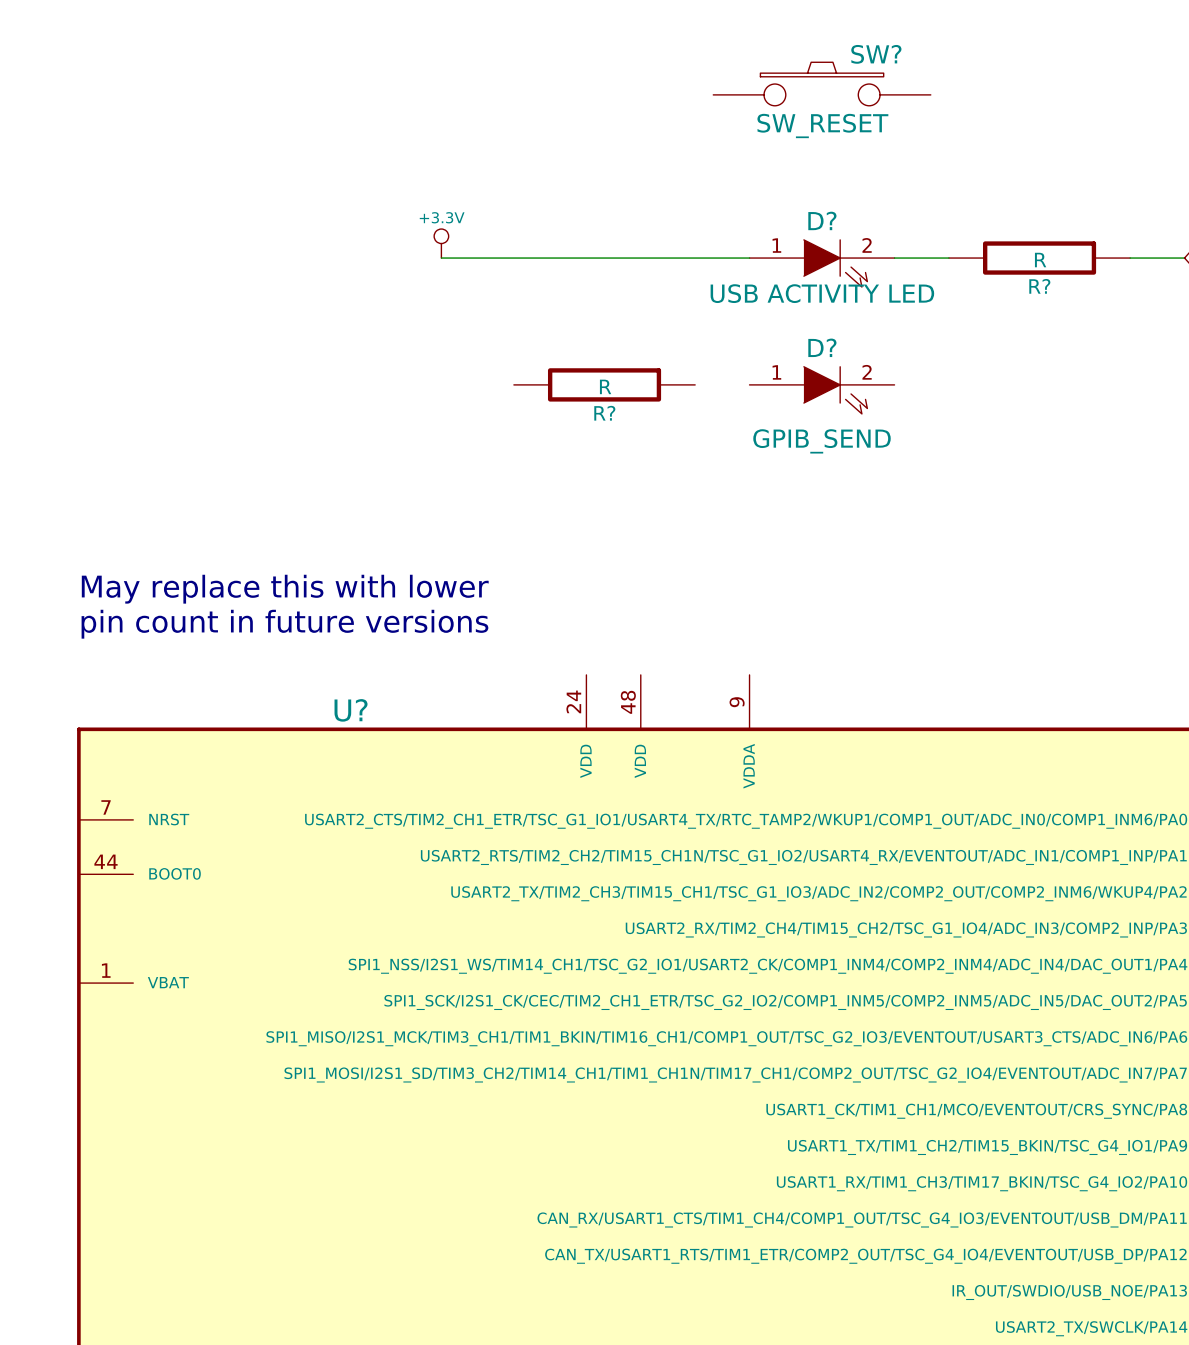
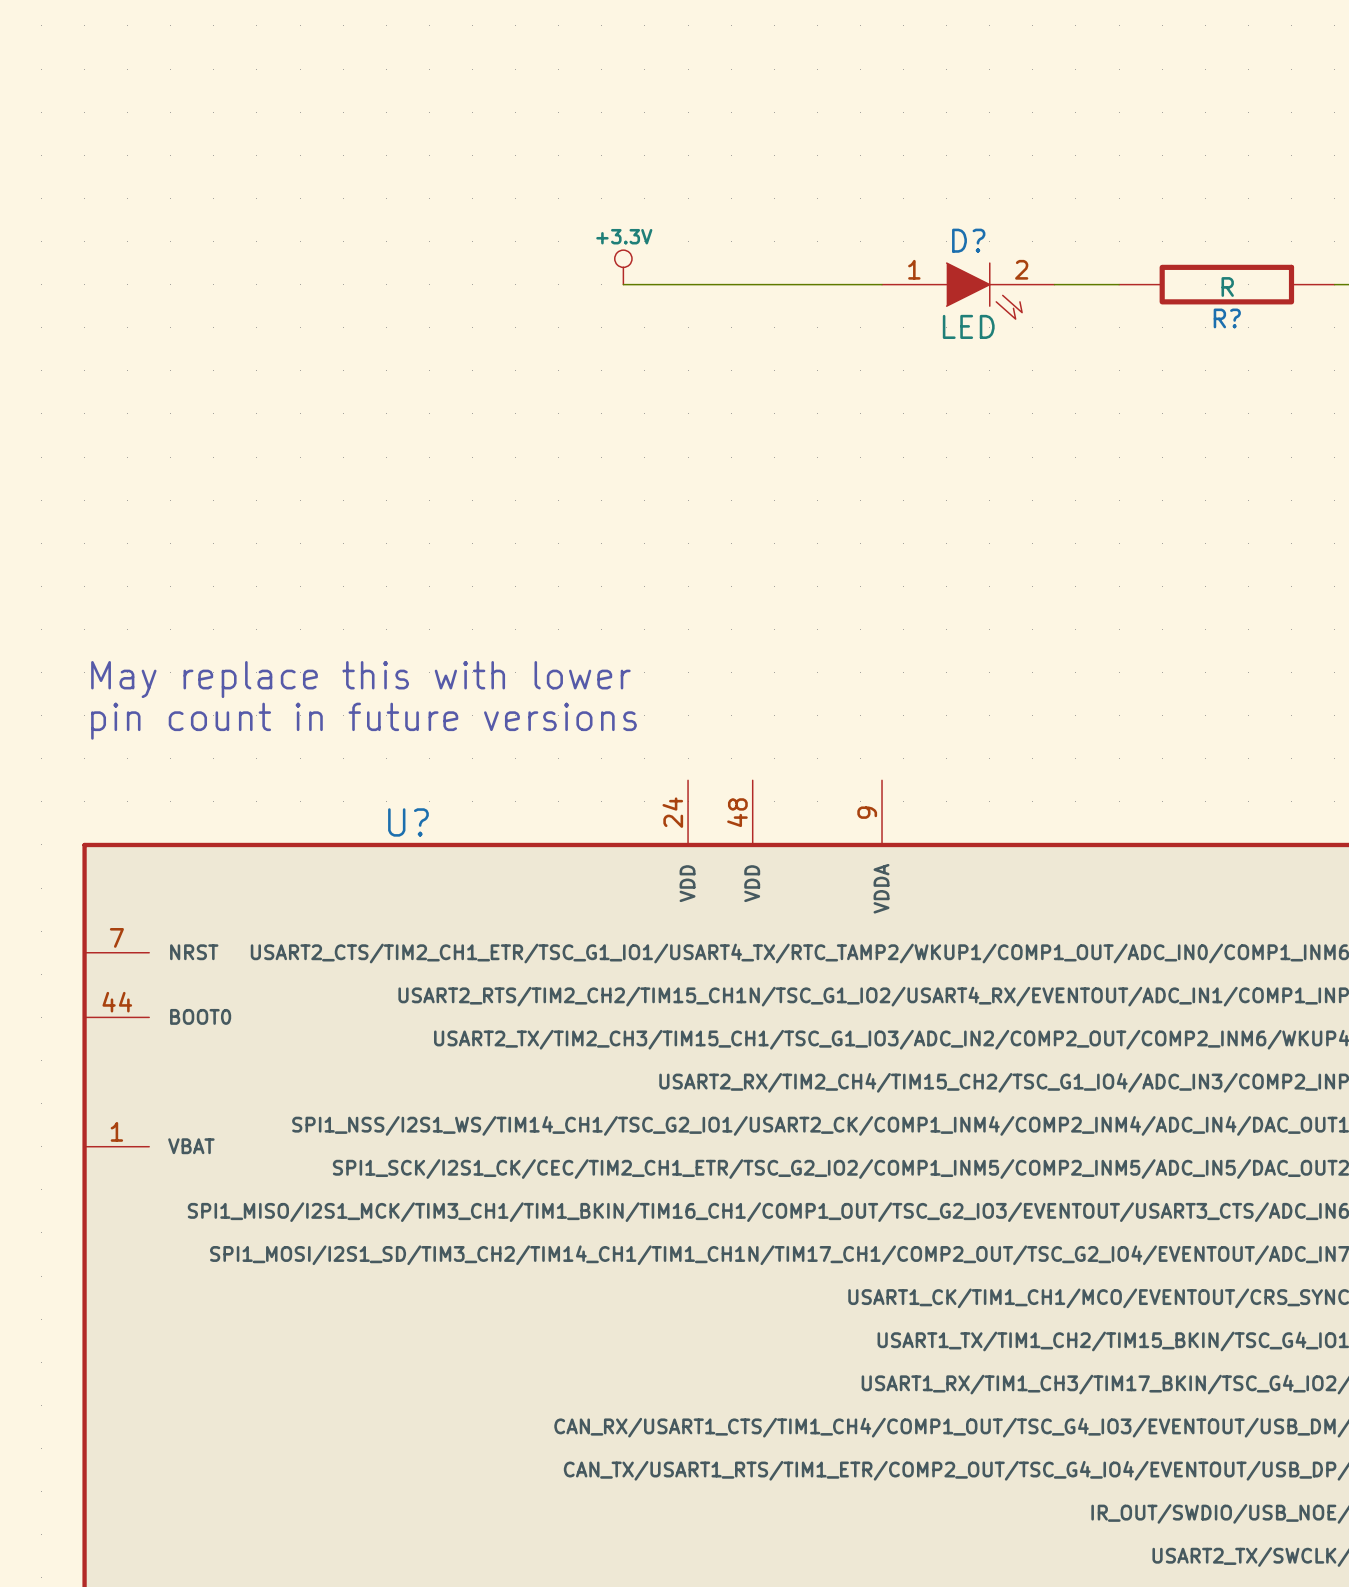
SW?: SW_RESET (822, 84) -> none
power symbol position: +3.3V (441, 243) -> +3.3V (623, 267)
wire: (441, 258) (532, 258) -> none
D? value: USB ACTIVITY LED (822, 293) -> LED (968, 326)
R?: R (604, 384) -> none
D?: GPIB_SEND (822, 390) -> none

